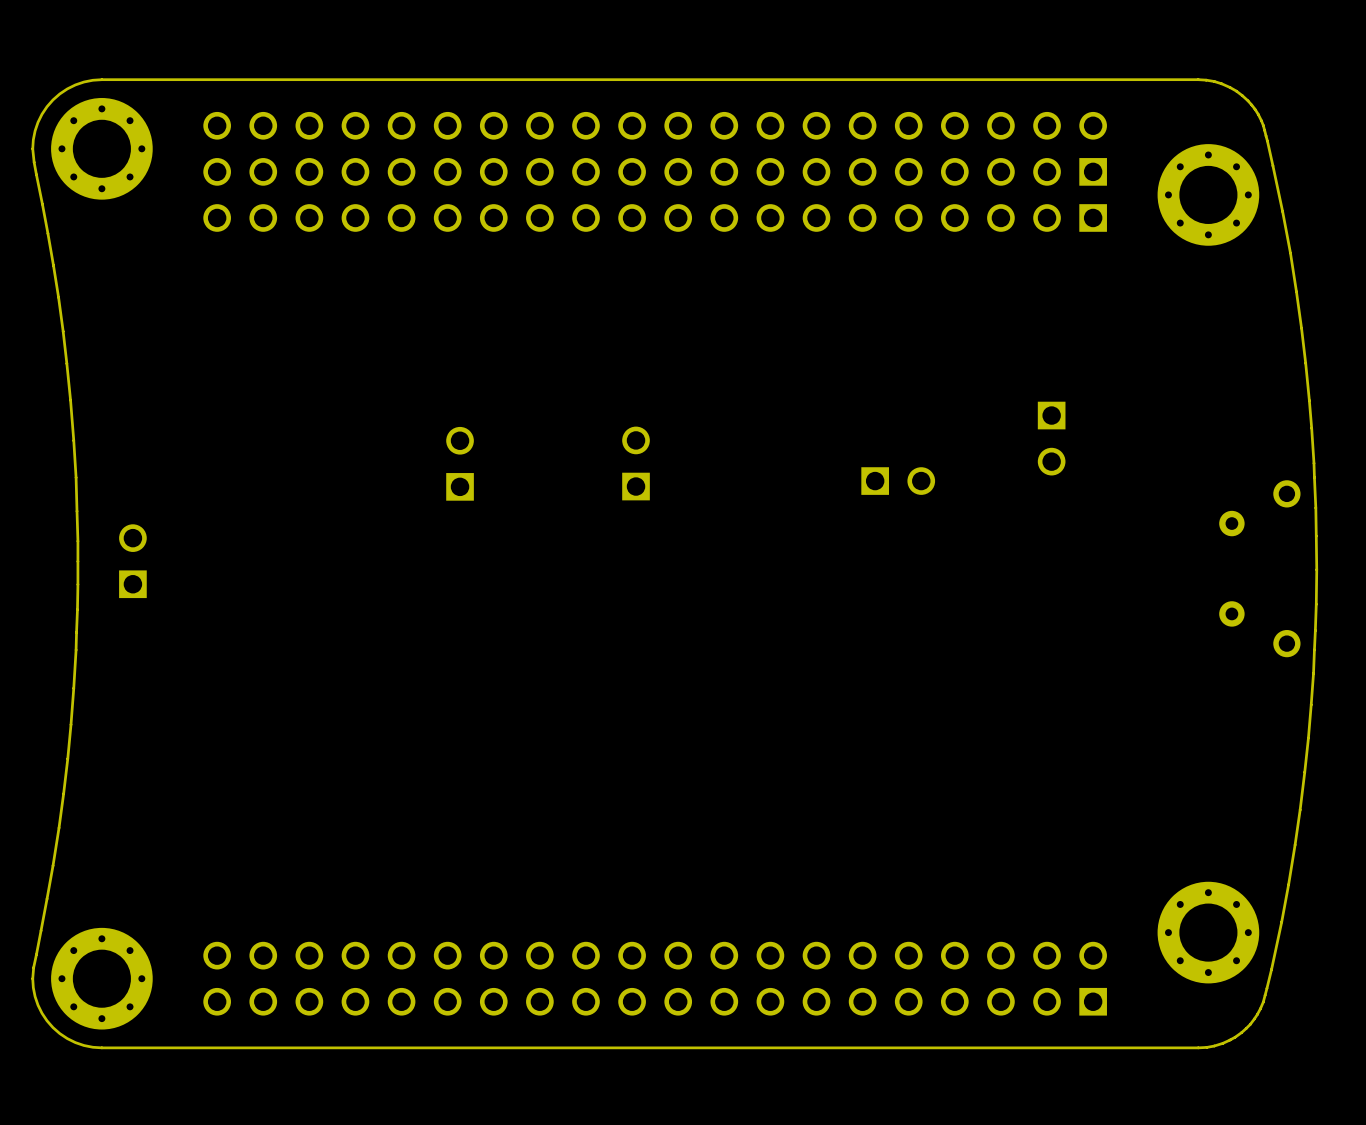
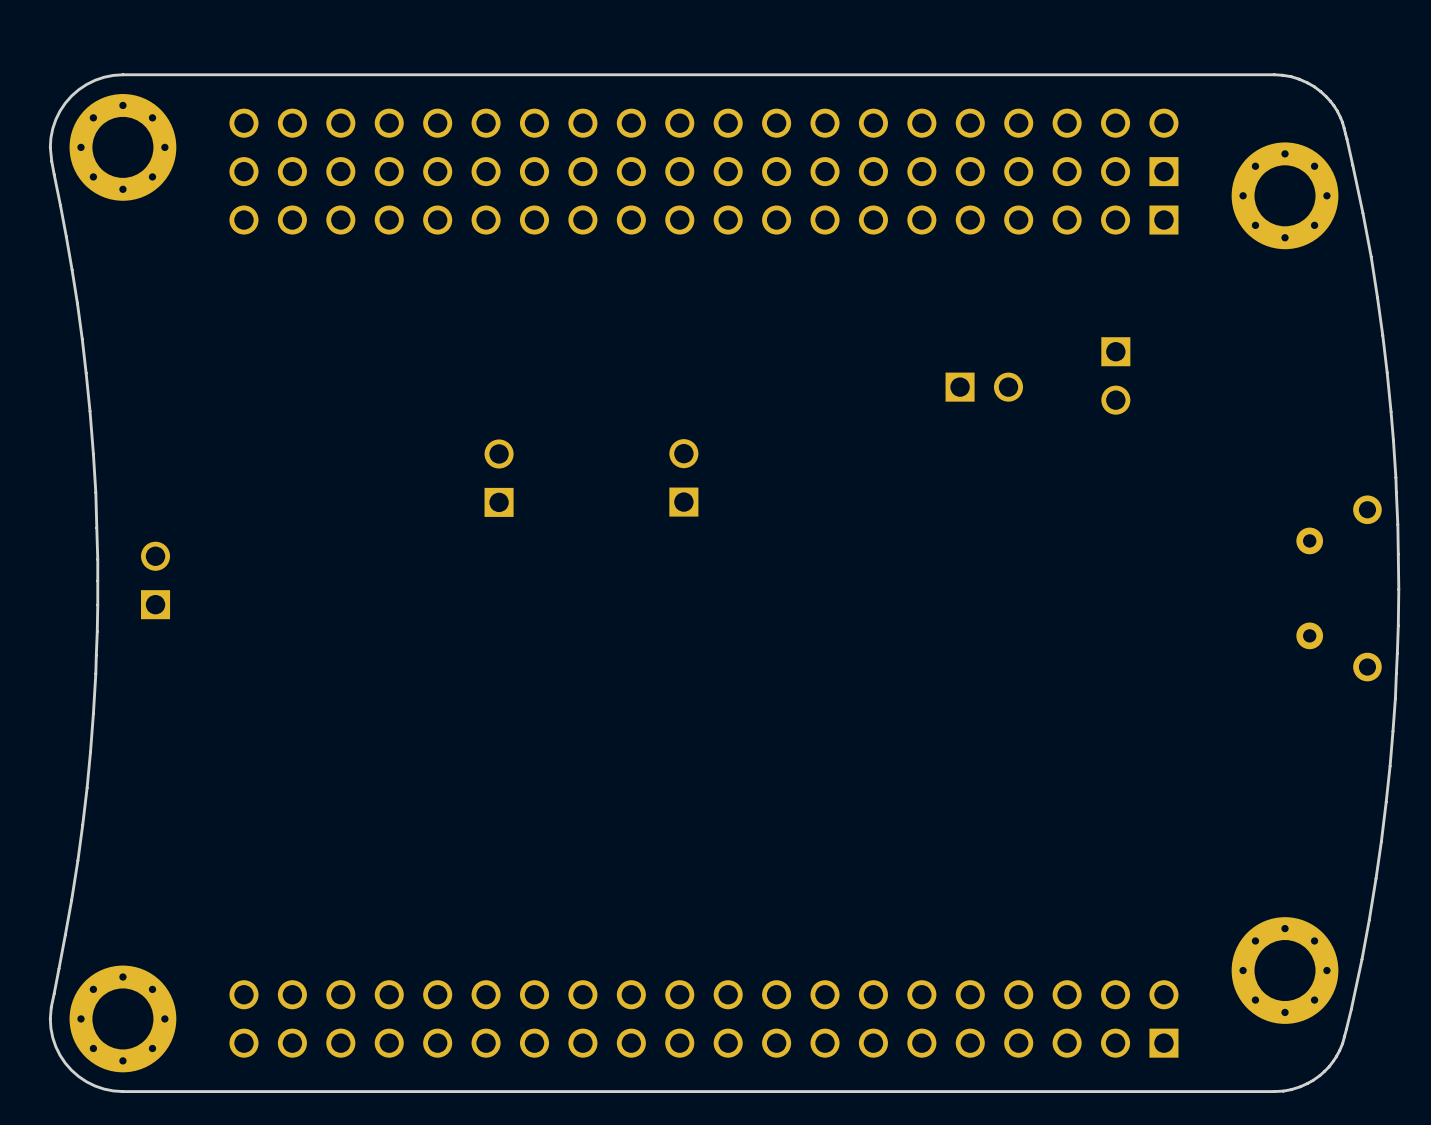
part: none -> (1115, 375)
part: none -> (984, 387)
part: (1051, 438) -> none
part: (898, 481) -> none

